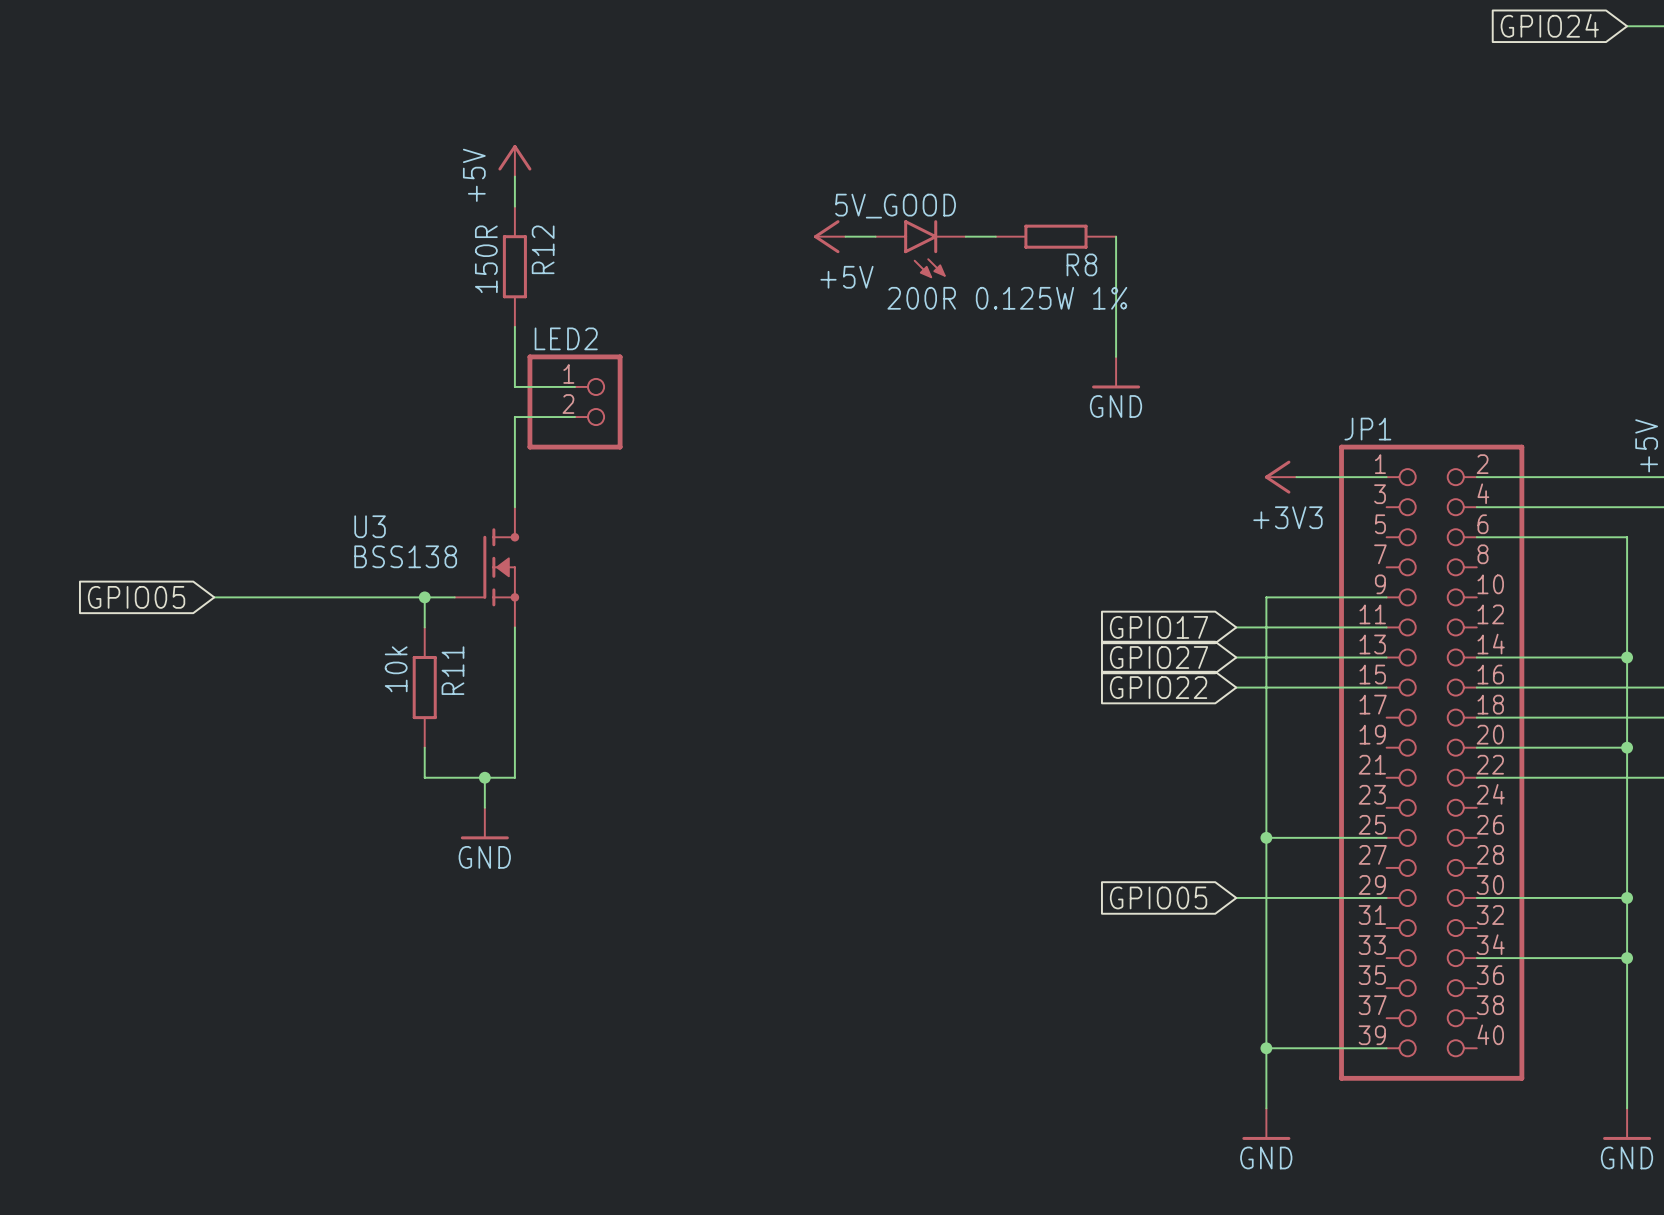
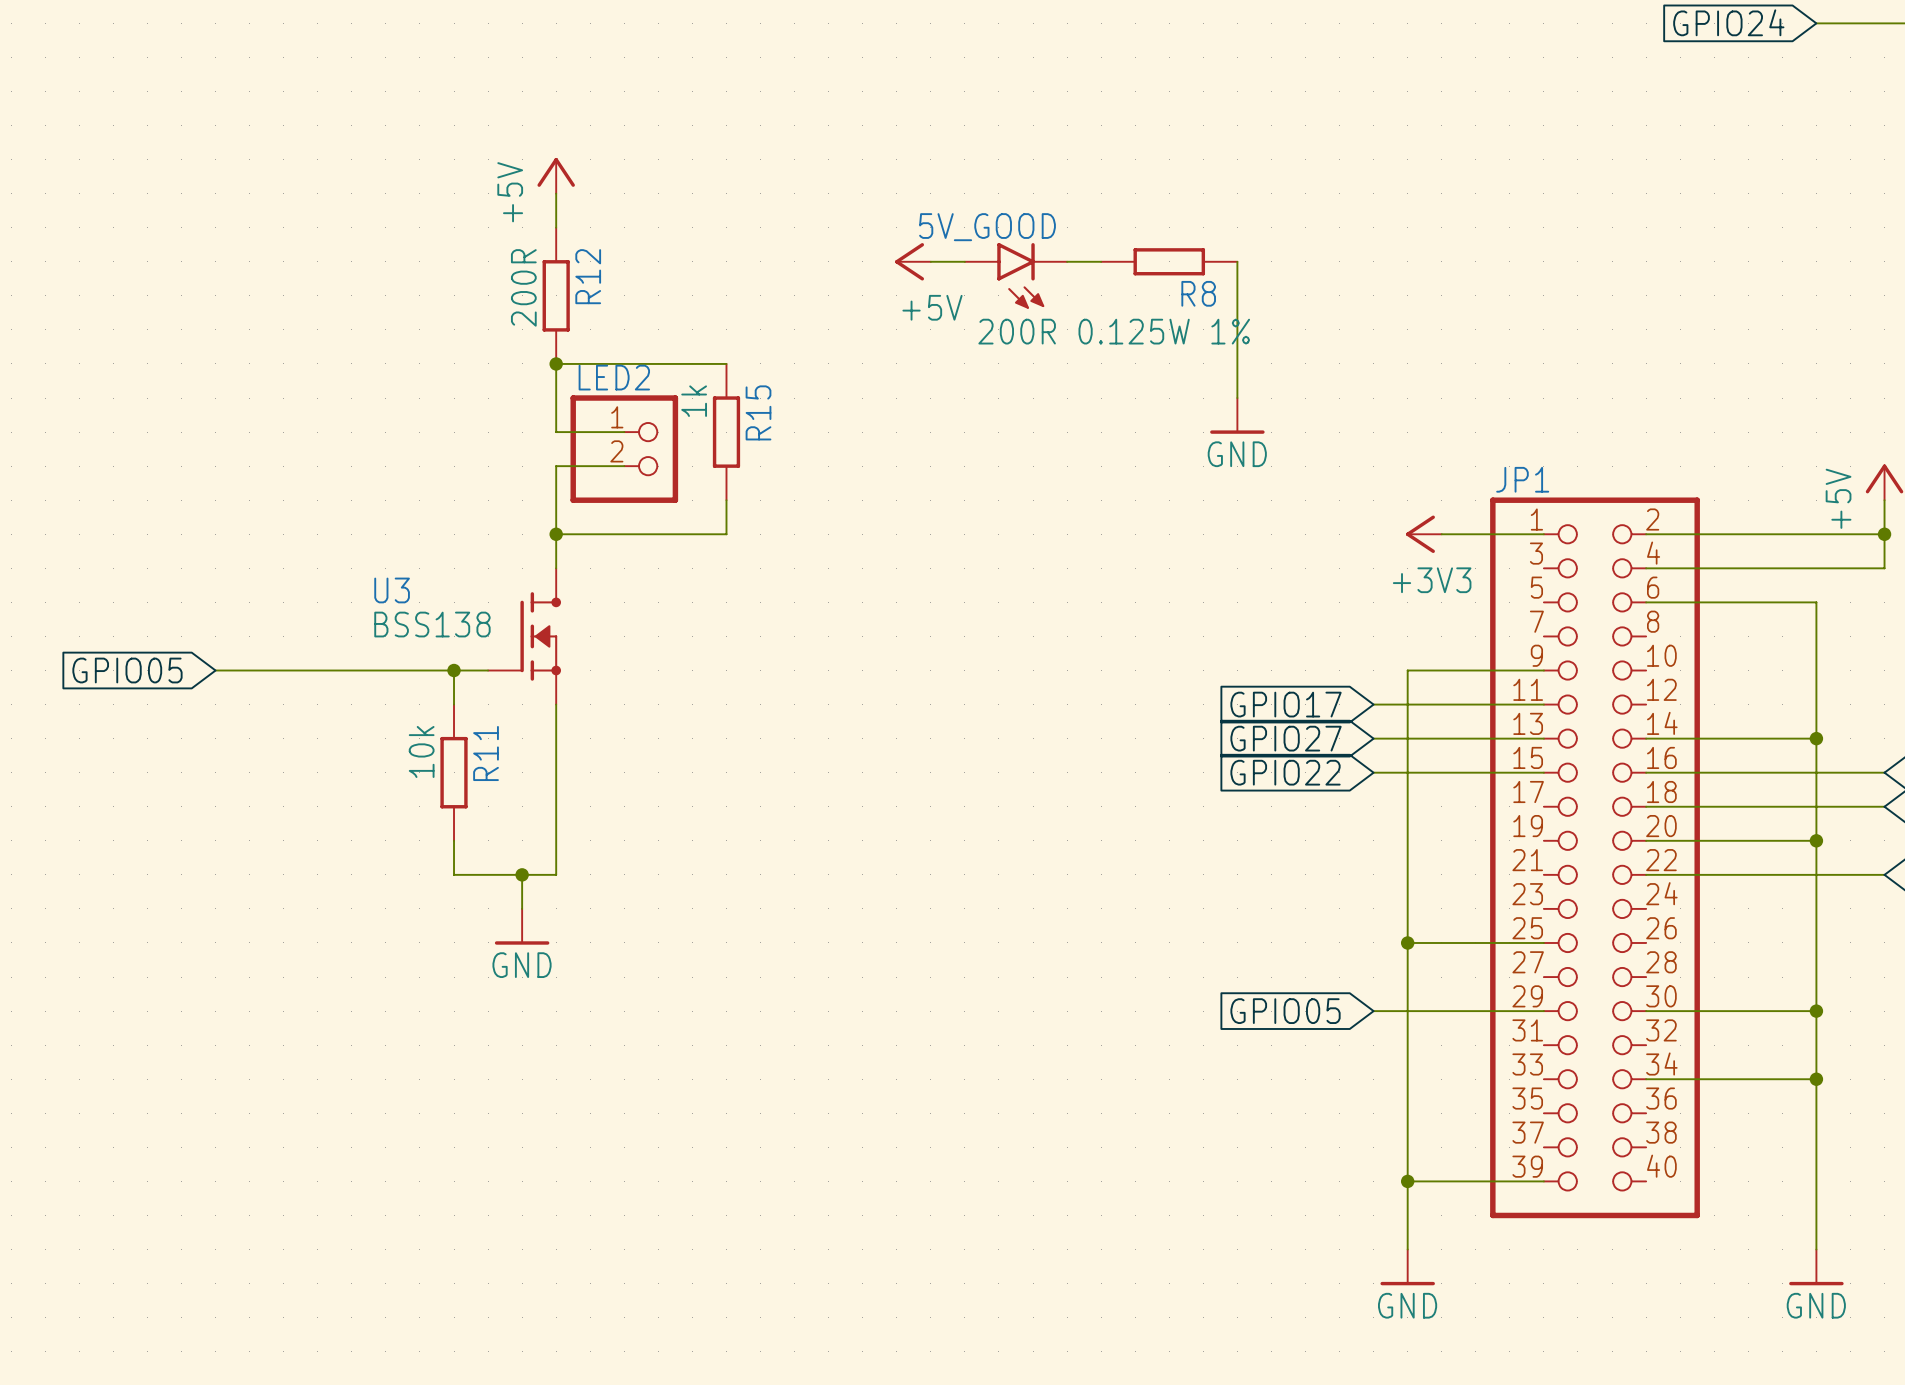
R12 value: 150R (486, 259) -> 200R (523, 287)
wire: none -> (556, 363) (726, 363)
junction: none -> (556, 363)
R15: none -> 1k (726, 432)
wire: none -> (726, 500) (726, 534) (556, 534)
junction: none -> (556, 534)

